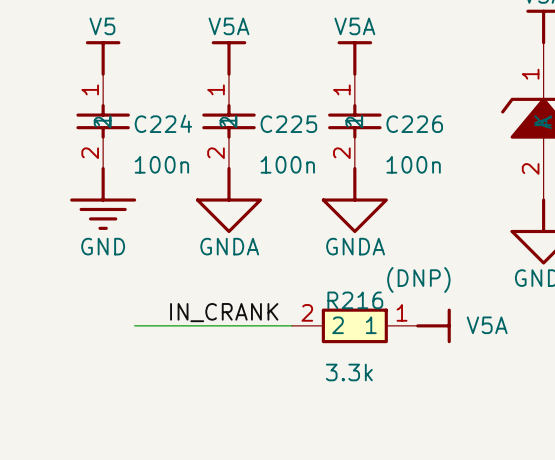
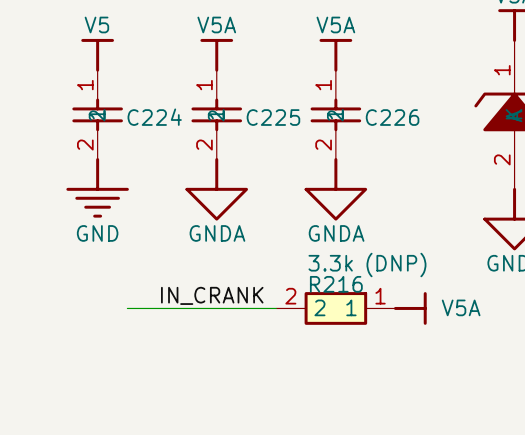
C224 value: 100n (161, 164) -> none
C225 value: 100n (287, 164) -> none
C226 value: 100n (413, 164) -> none
R216 text: none -> 3.3k (330, 263)
R216 value: 3.3k (349, 372) -> none

